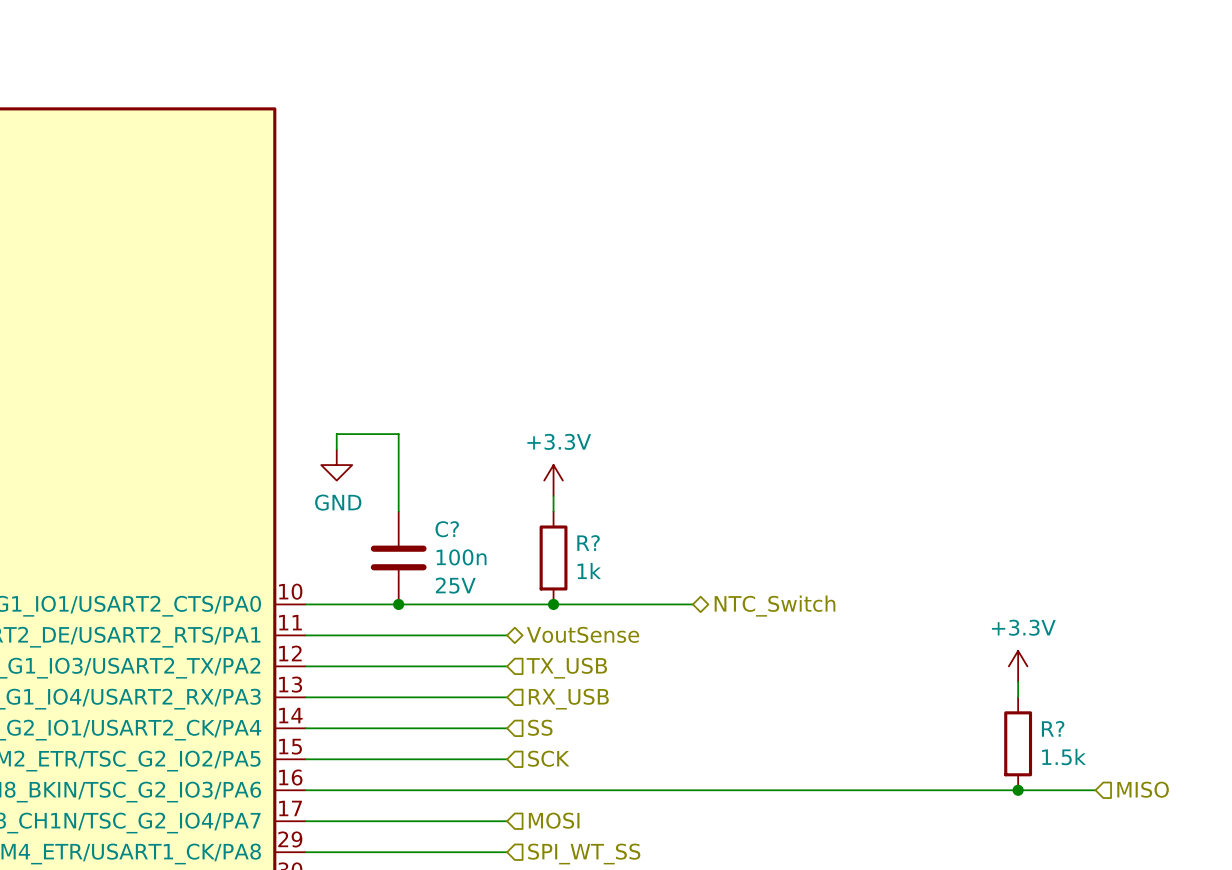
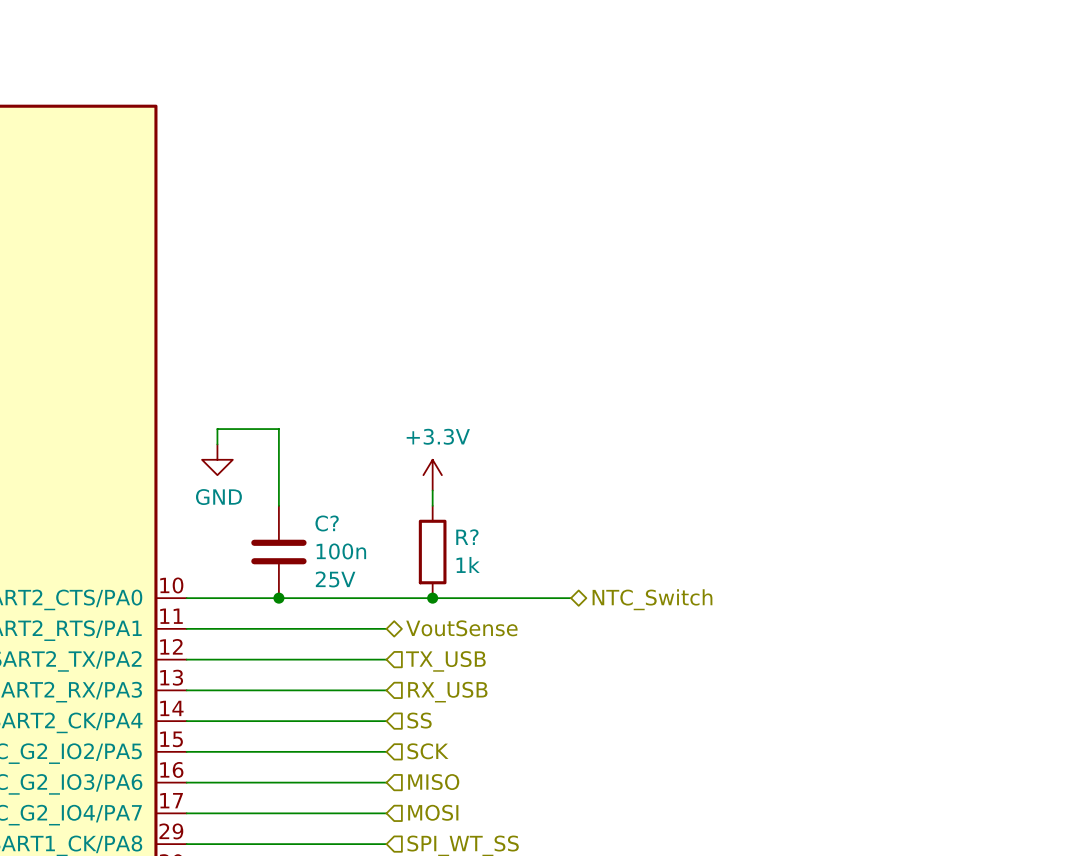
power symbol: +3.3V (1018, 666) -> none
wire: (1018, 681) (1018, 697) -> none
R?: 1.5k (1018, 743) -> none
hierarchical label: none -> MISO (433, 782)
hierarchical label: MISO (1143, 789) -> none
wire: (507, 790) (1095, 790) -> none
junction: (1018, 790) -> none

